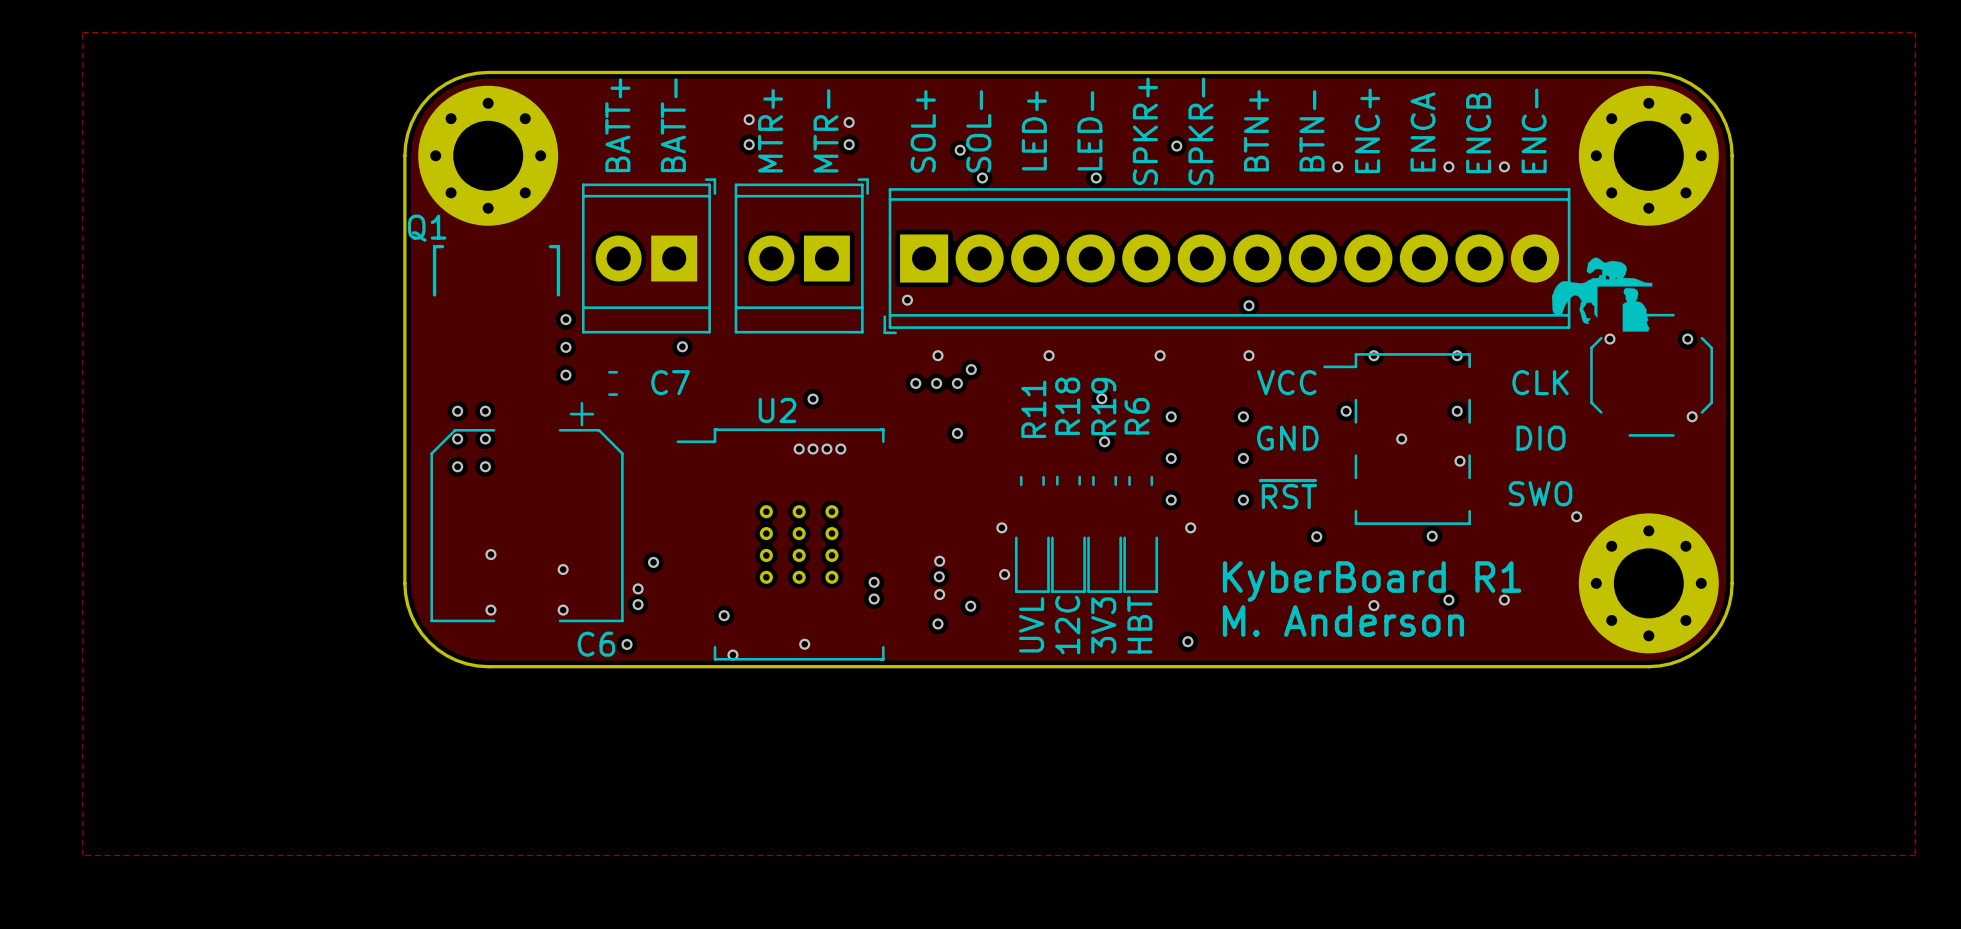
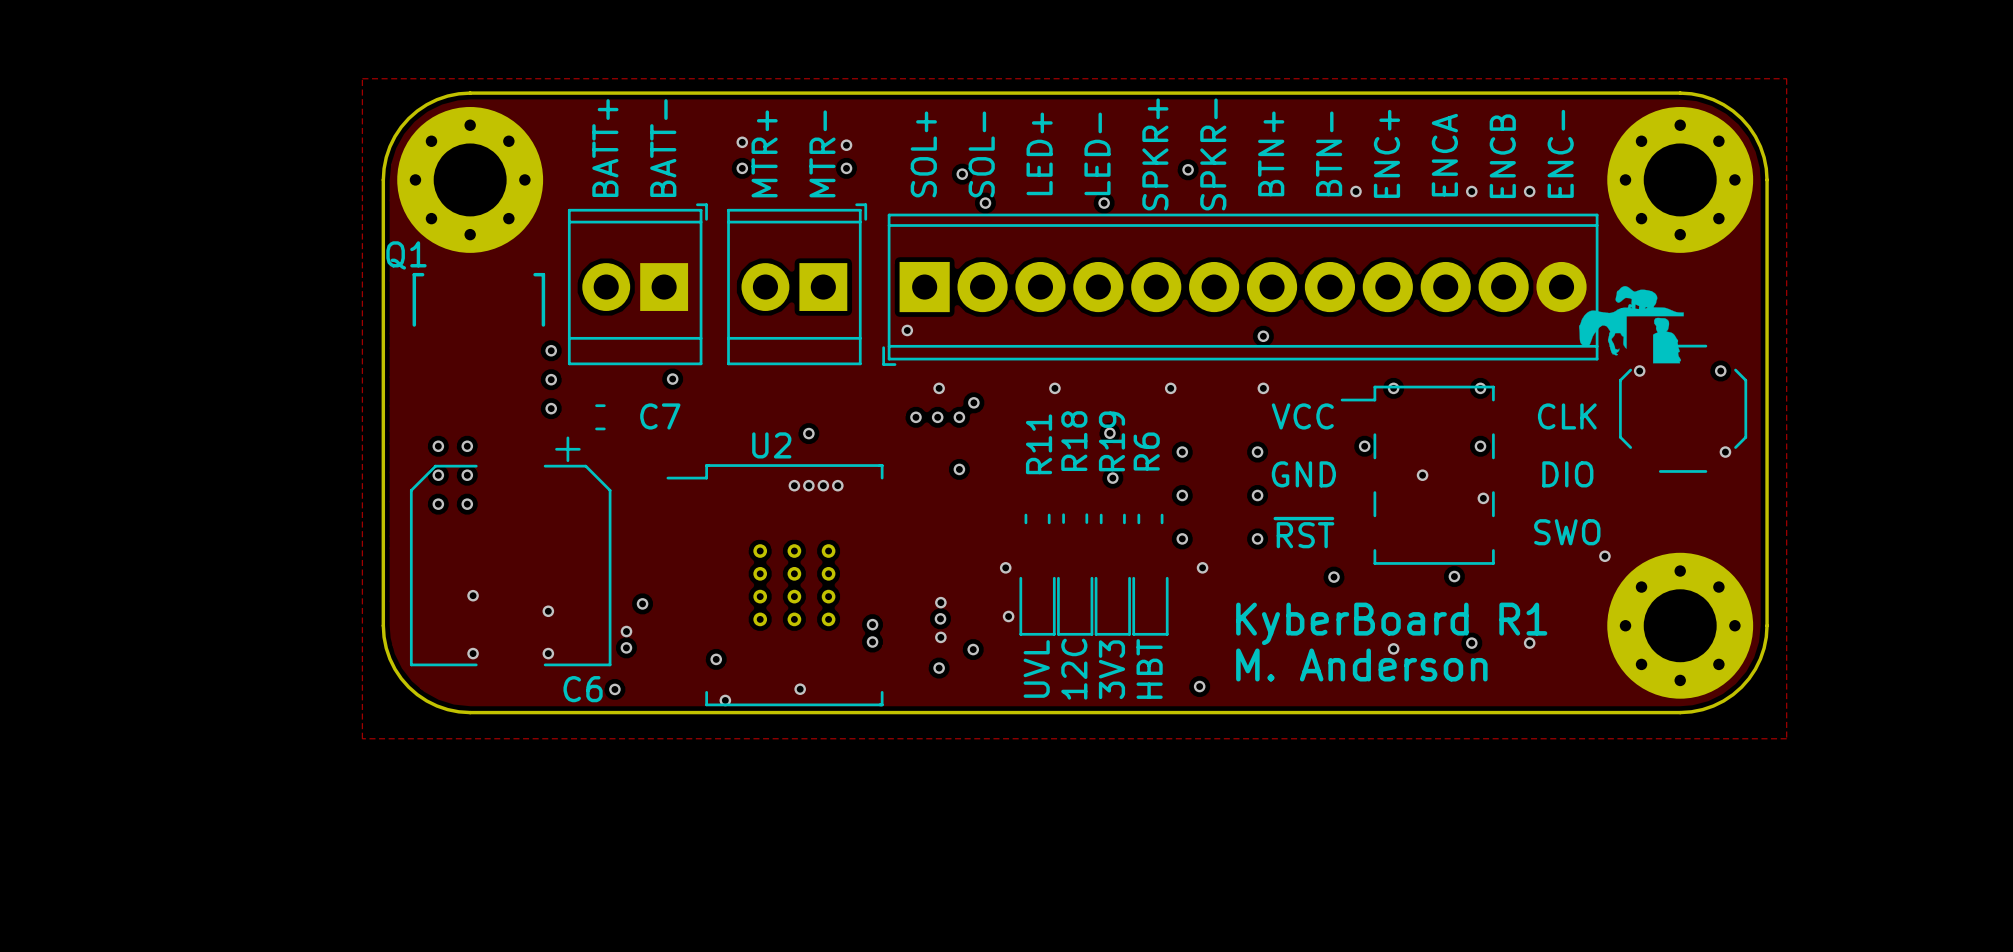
zone outline: (82, 32) (1915, 32) (1915, 855) (82, 855) (82, 32) -> (362, 78) (362, 738) (1786, 738) (1786, 78) (362, 78)

